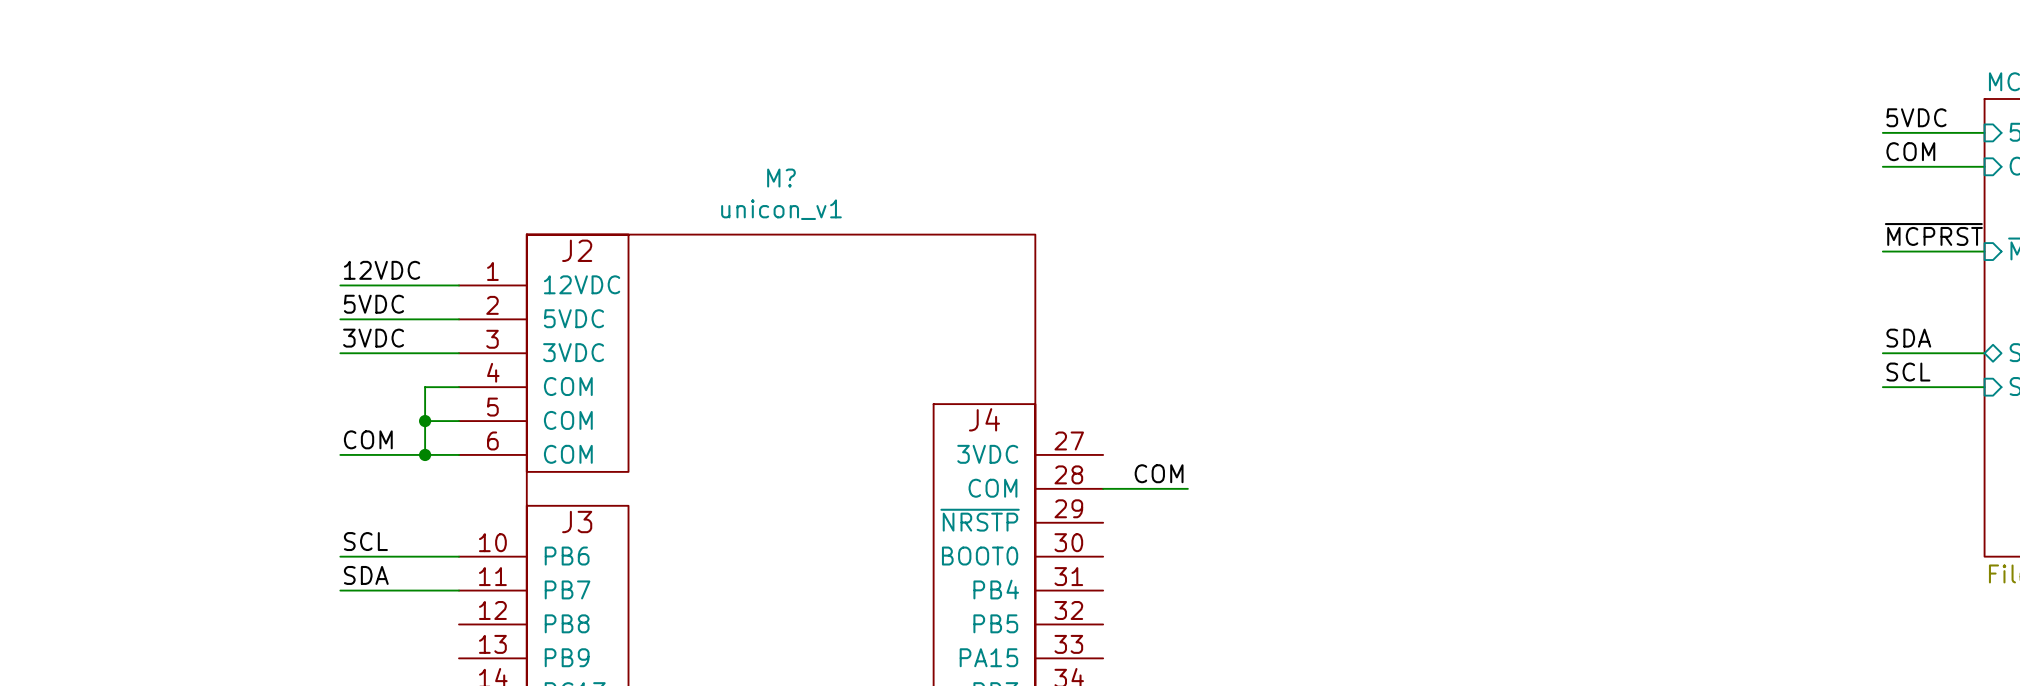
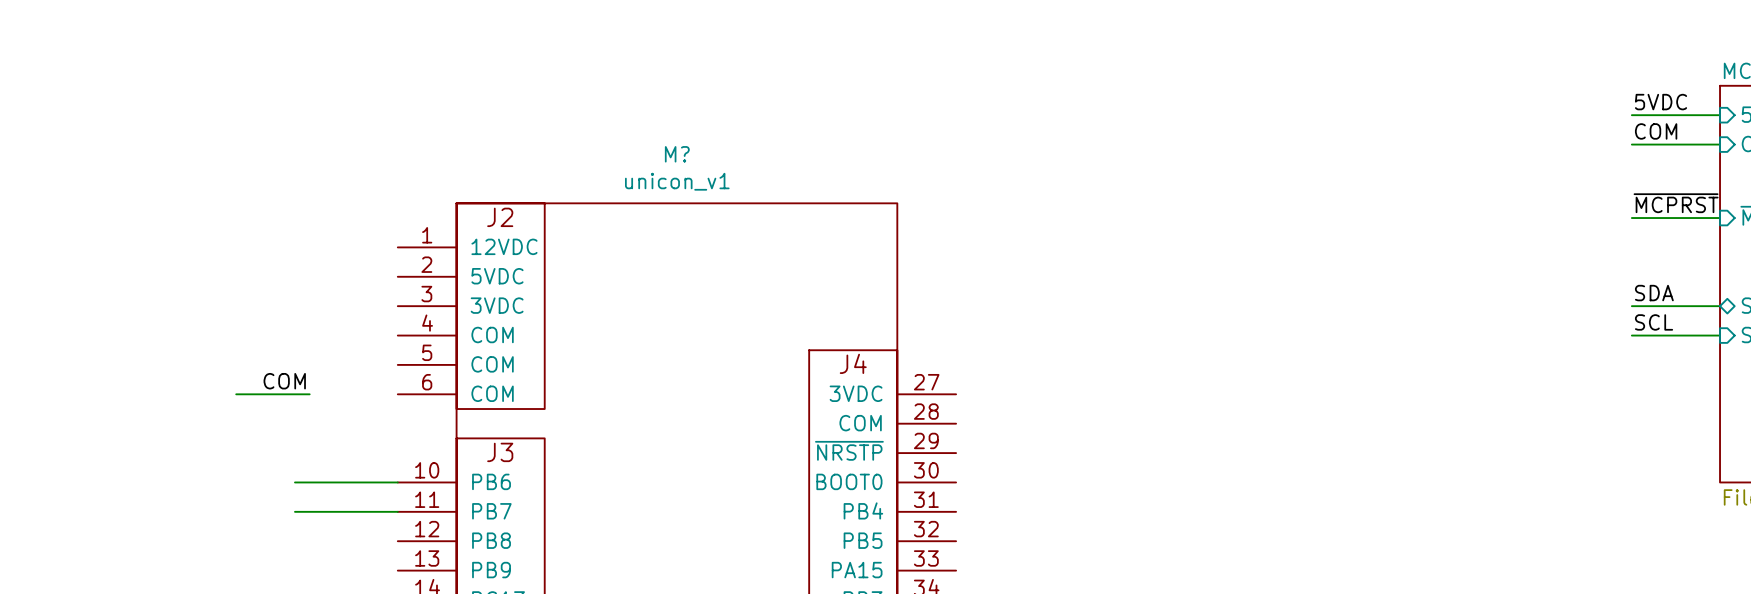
label: 12VDC (382, 270) -> none
wire: (340, 285) (459, 285) -> none
label: 5VDC (373, 304) -> none
wire: (340, 319) (459, 319) -> none
label: 3VDC (373, 338) -> none
wire: (340, 353) (459, 353) -> none
wire: (459, 387) (425, 387) (425, 454) -> none
wire: (425, 421) (459, 421) -> none
junction: (425, 421) -> none
label position: COM (368, 439) -> COM (284, 381)
wire: none -> (236, 394) (294, 394)
wire: (357, 454) (459, 454) -> none
junction: (425, 454) -> none
label: COM (1159, 473) -> none
wire: (1103, 488) (1187, 488) -> none
label: SCL (365, 541) -> none
label: SDA (366, 575) -> none

